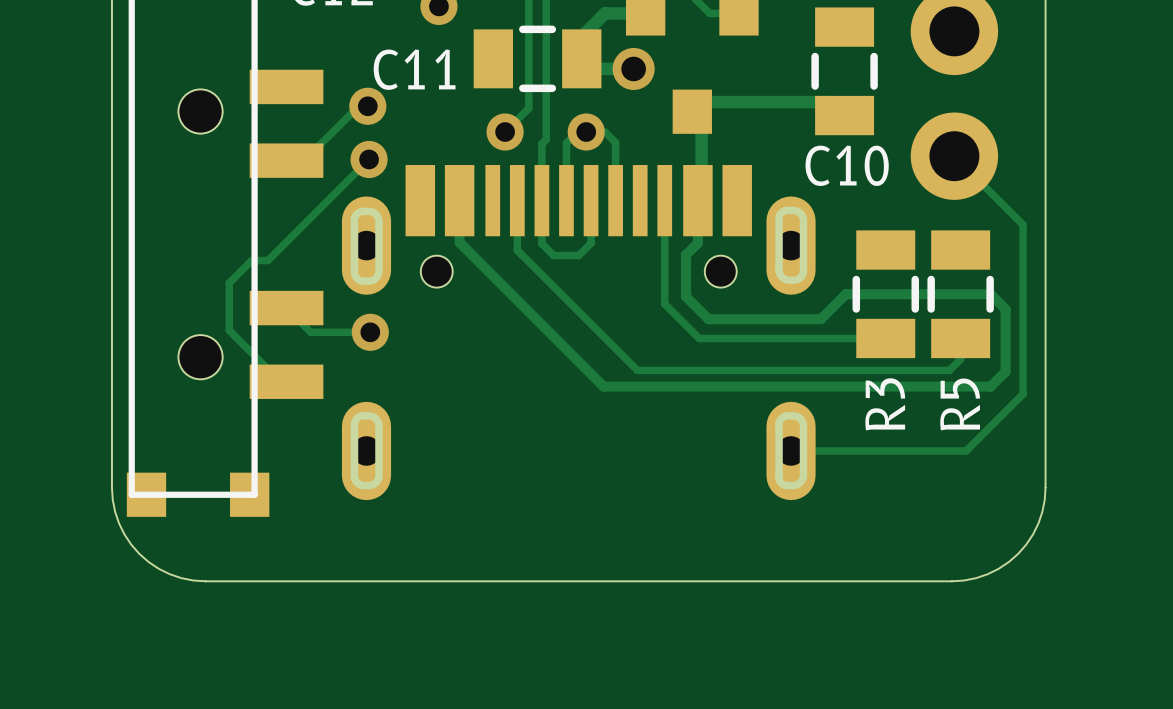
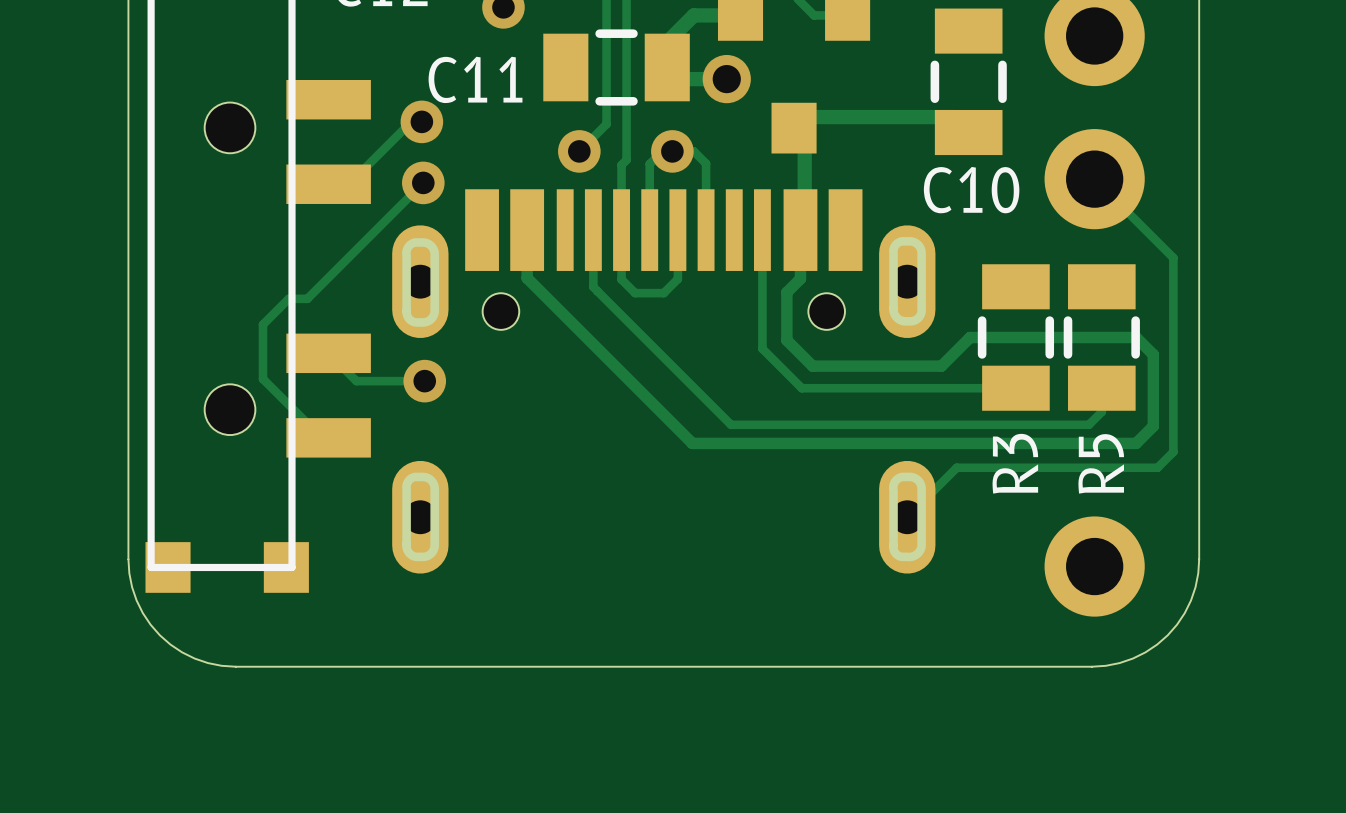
track: (1009, 407) (966, 450) (791, 450) -> (1157, 467) (956, 467) (907, 517)
part: none -> (1094, 566)

